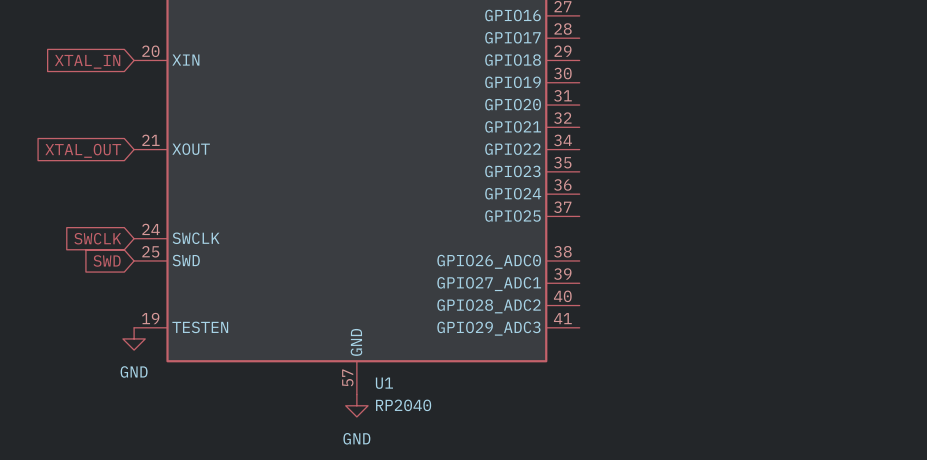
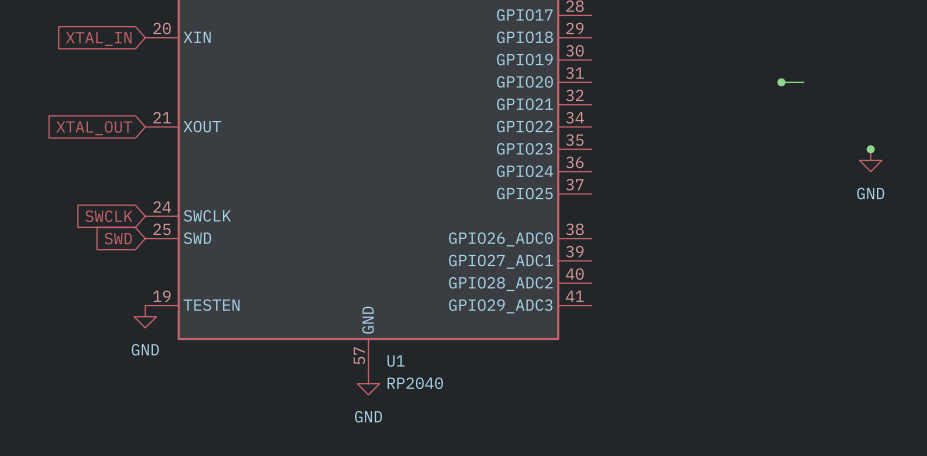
wire: none -> (781, 82) (803, 82)
junction: none -> (781, 82)
junction: none -> (870, 149)
power symbol: none -> GND (870, 160)

